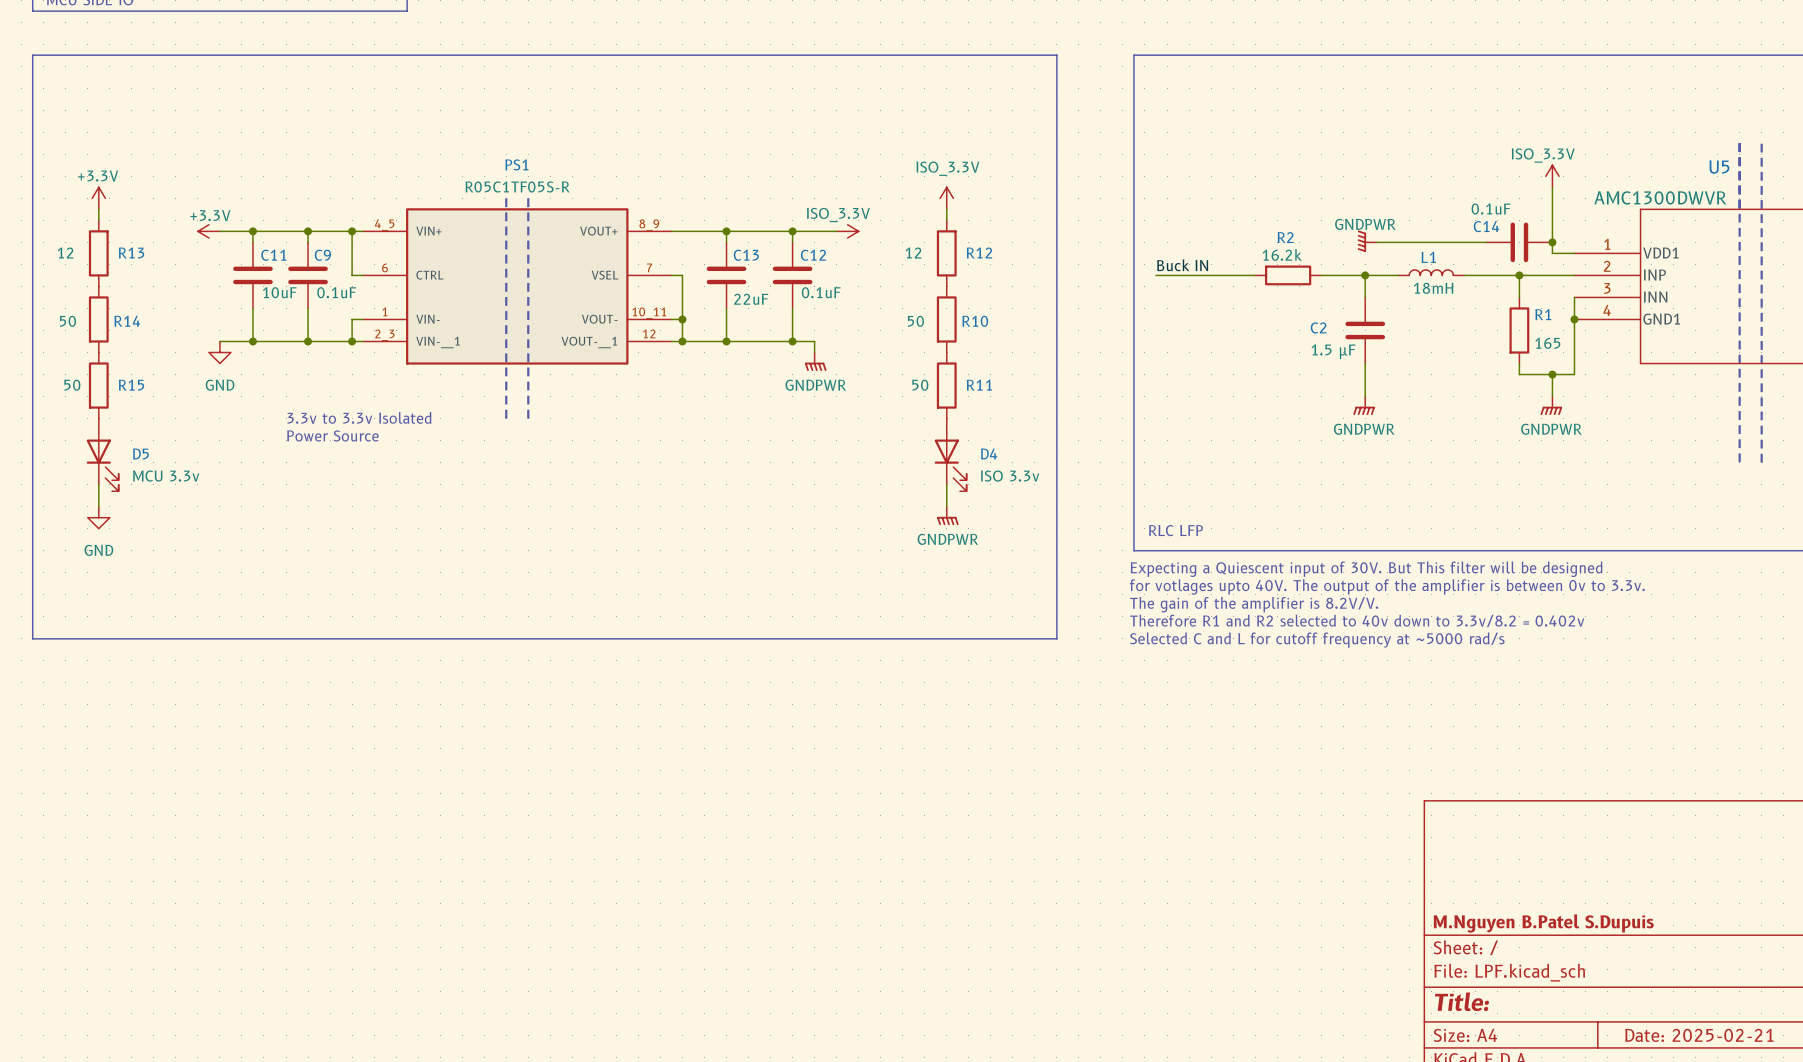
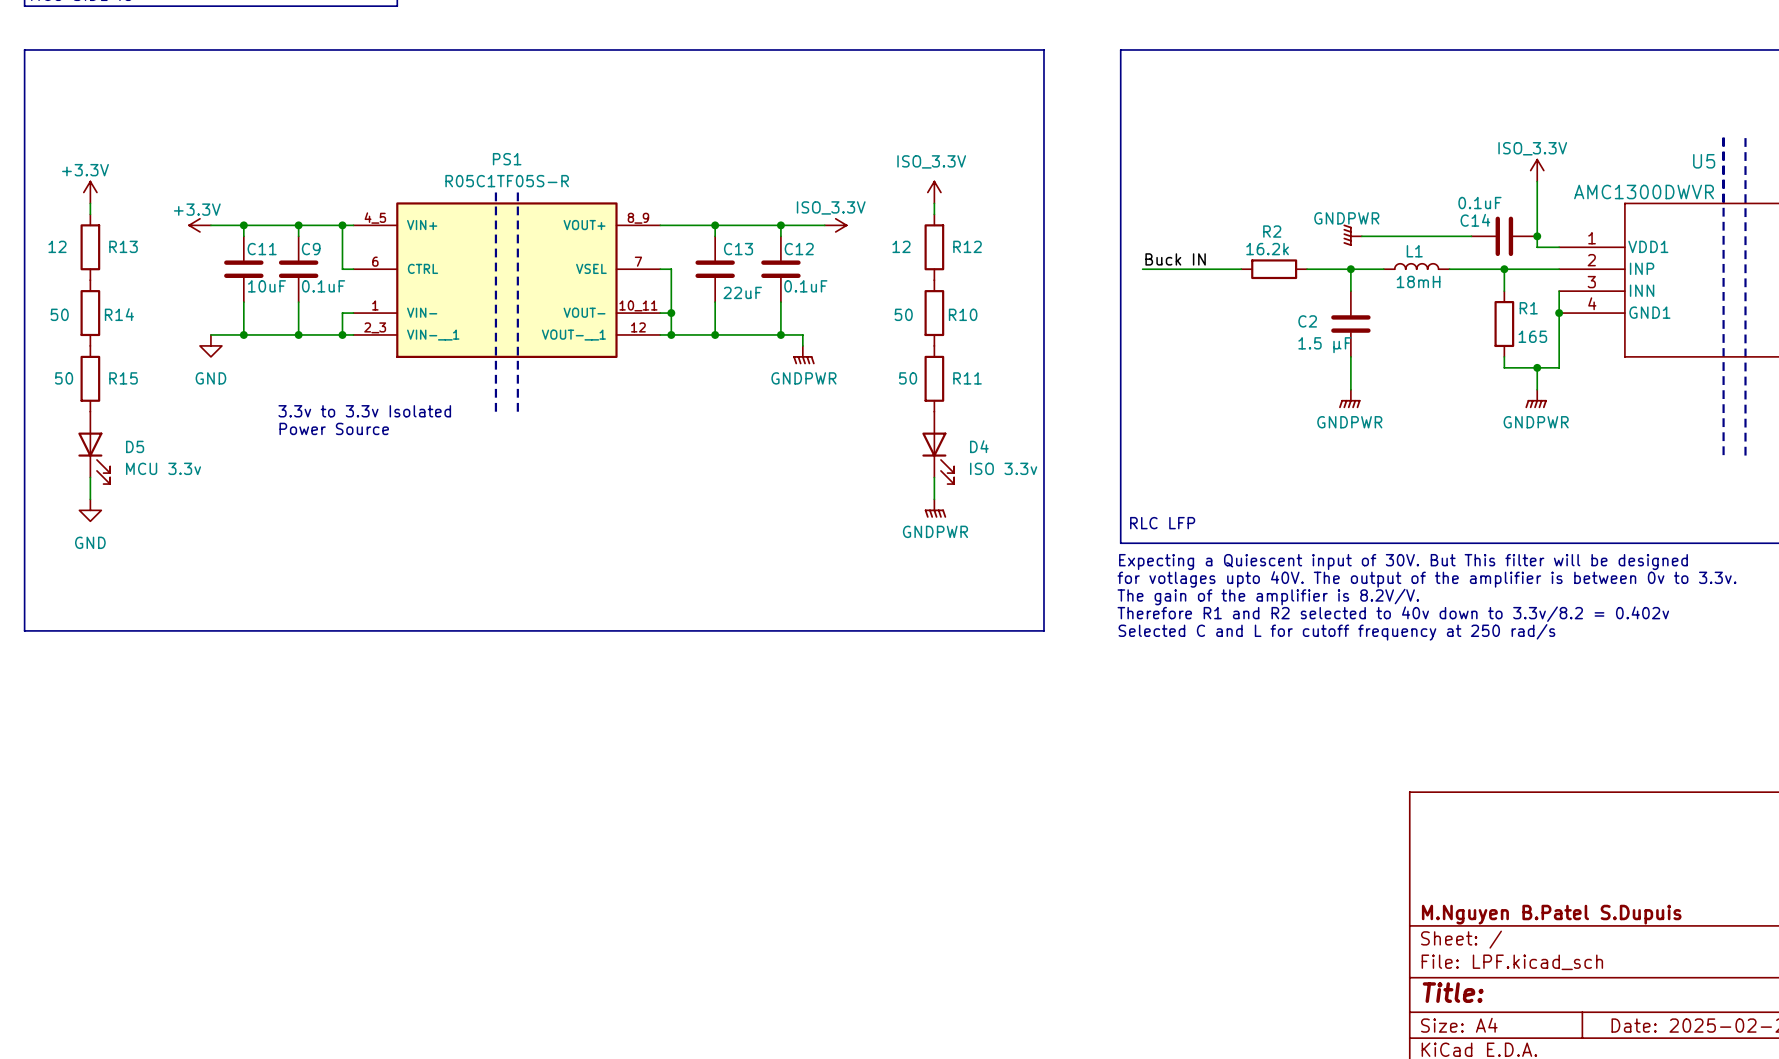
text: Selected C and L for cutoff frequency at ~5000 rad/s (1317, 640) -> Selected C and L for cutoff frequency at 250 rad/s (1336, 632)

